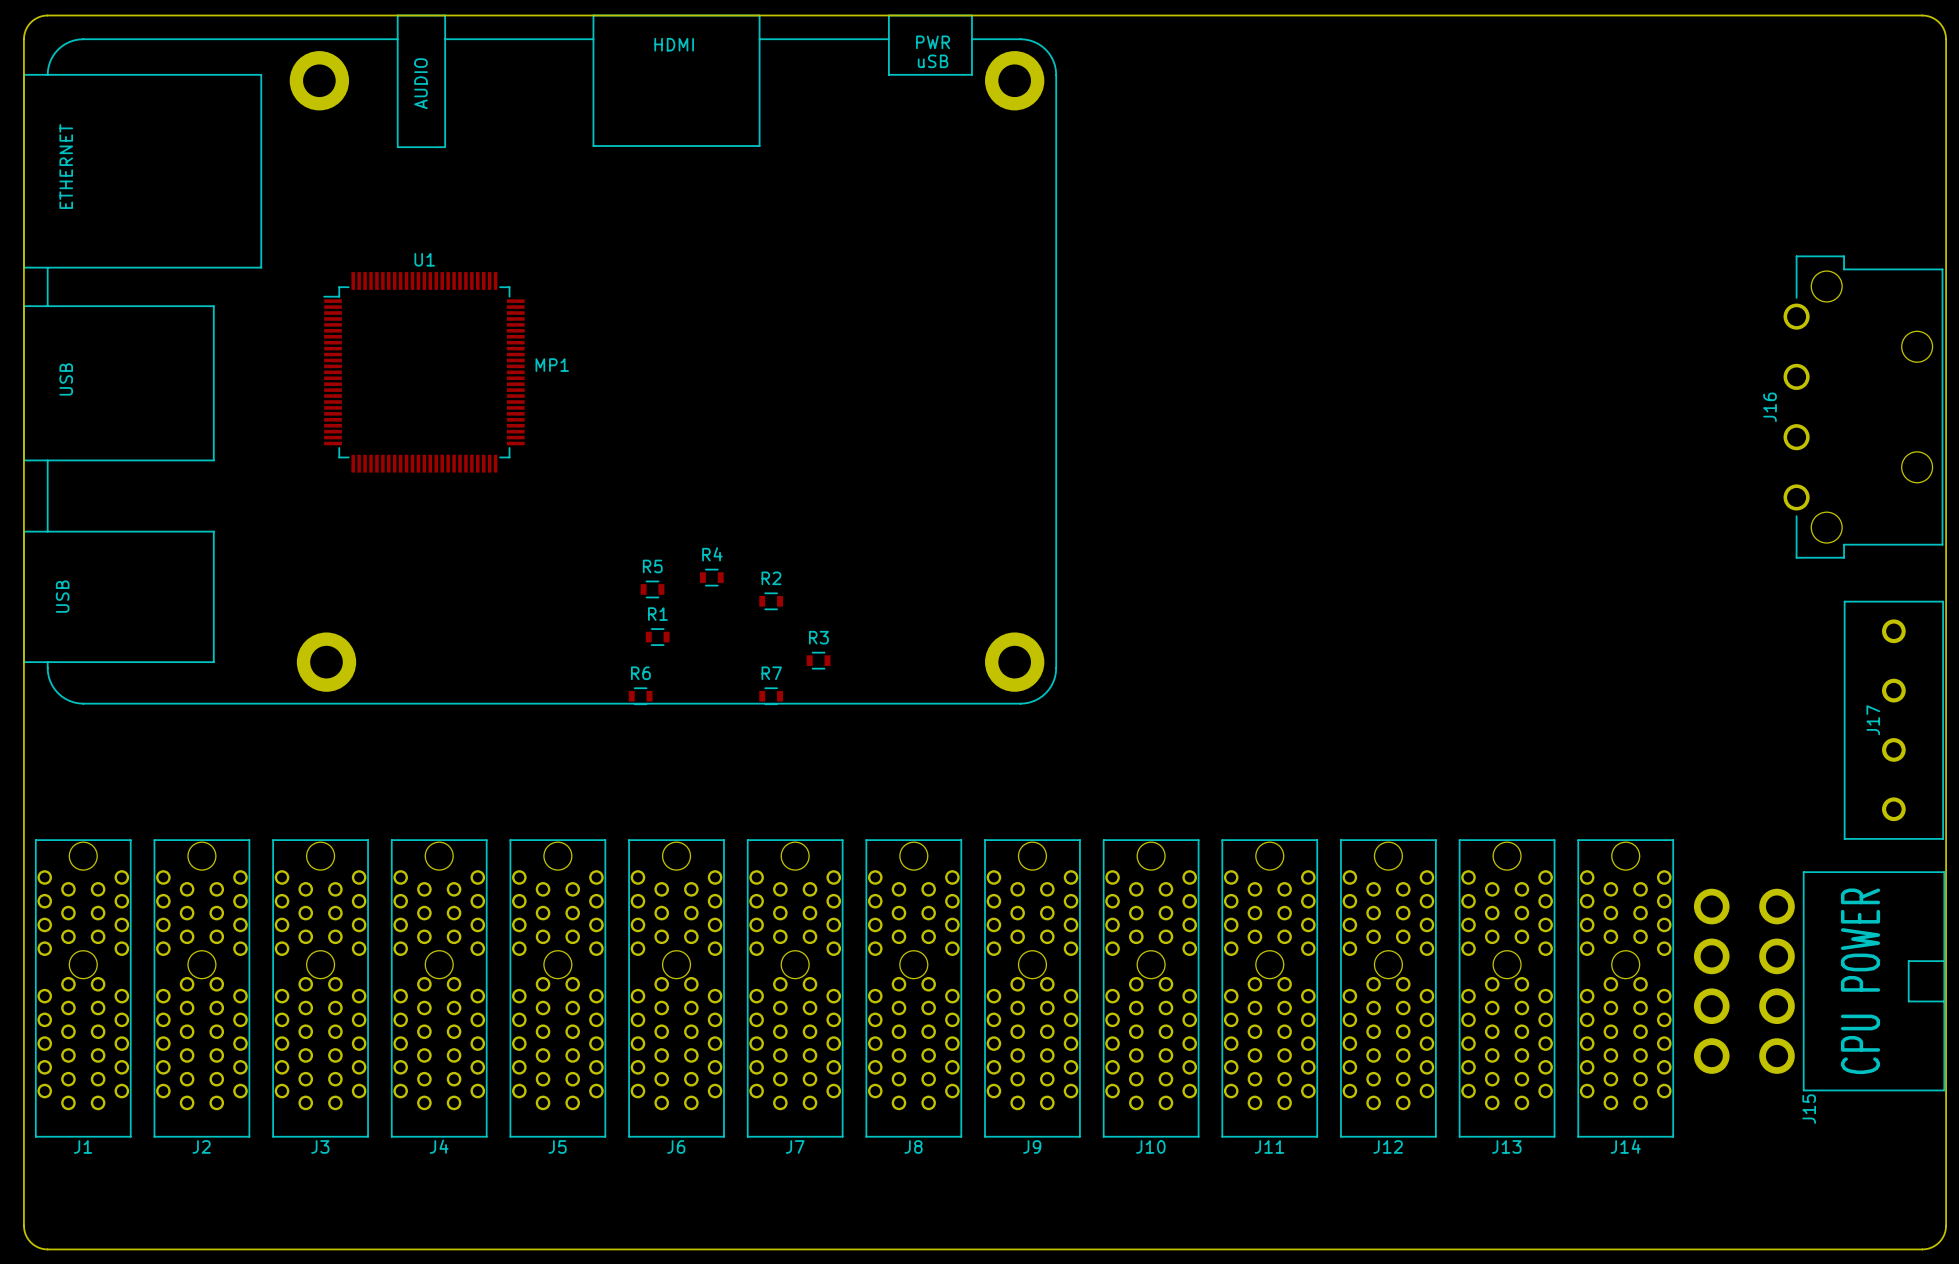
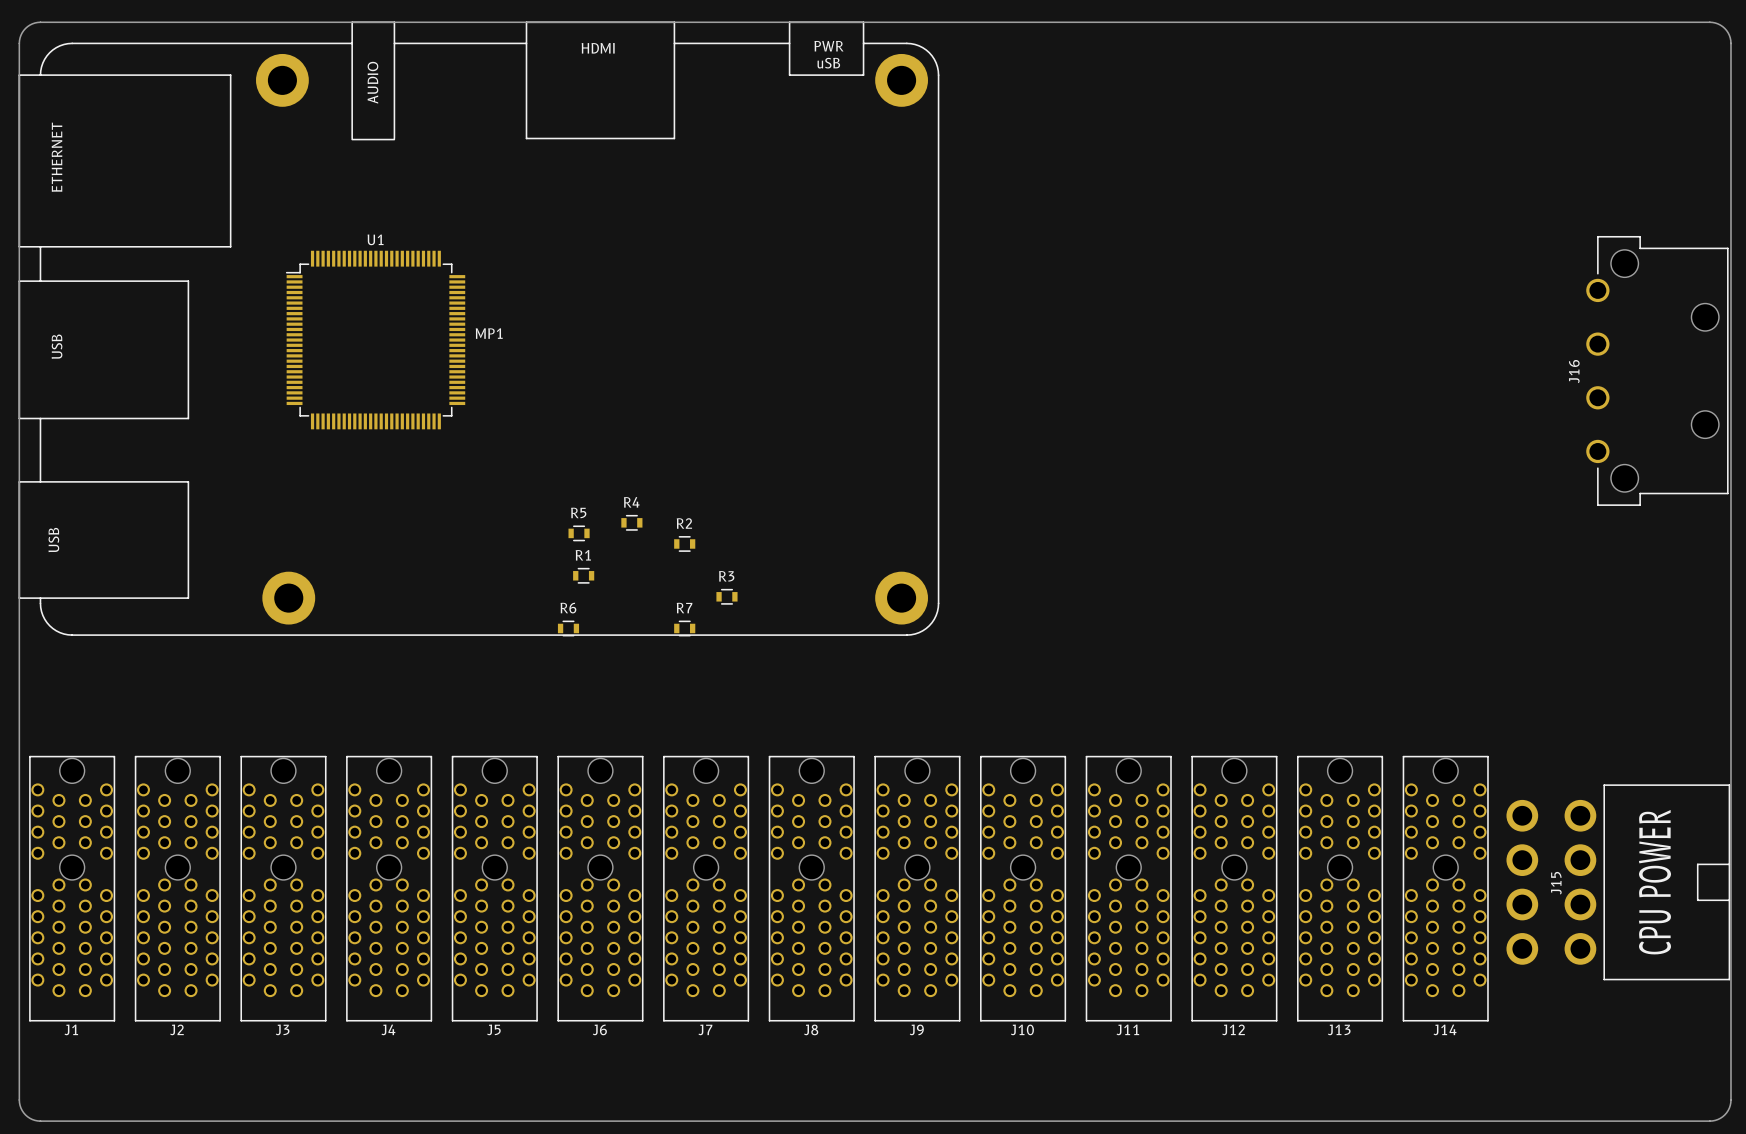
J17: (1893, 720) -> none
J15 name position: J15 (1809, 1109) -> J15 (1556, 883)

